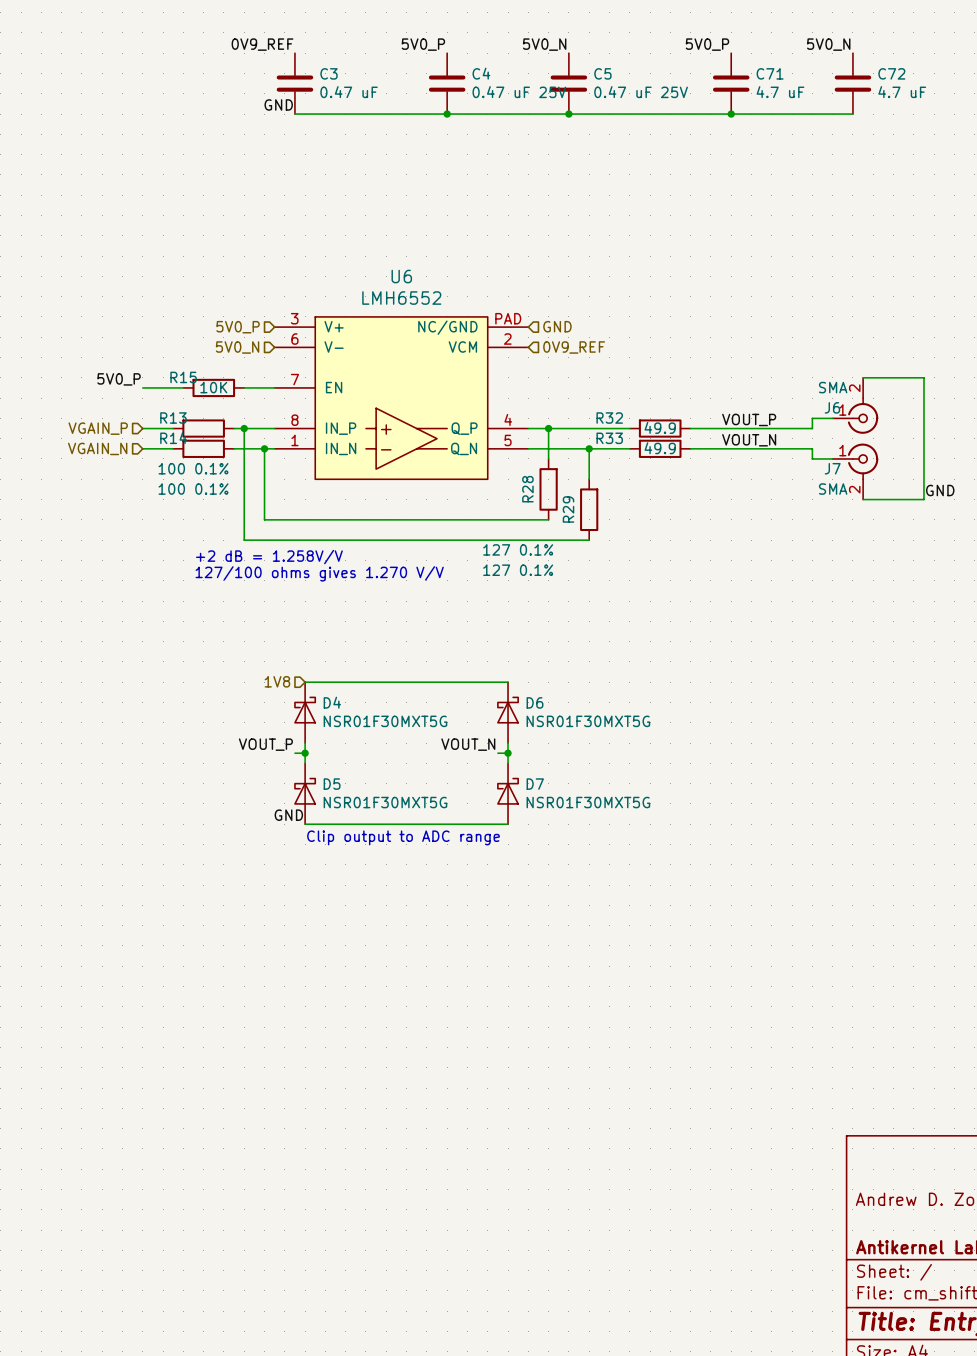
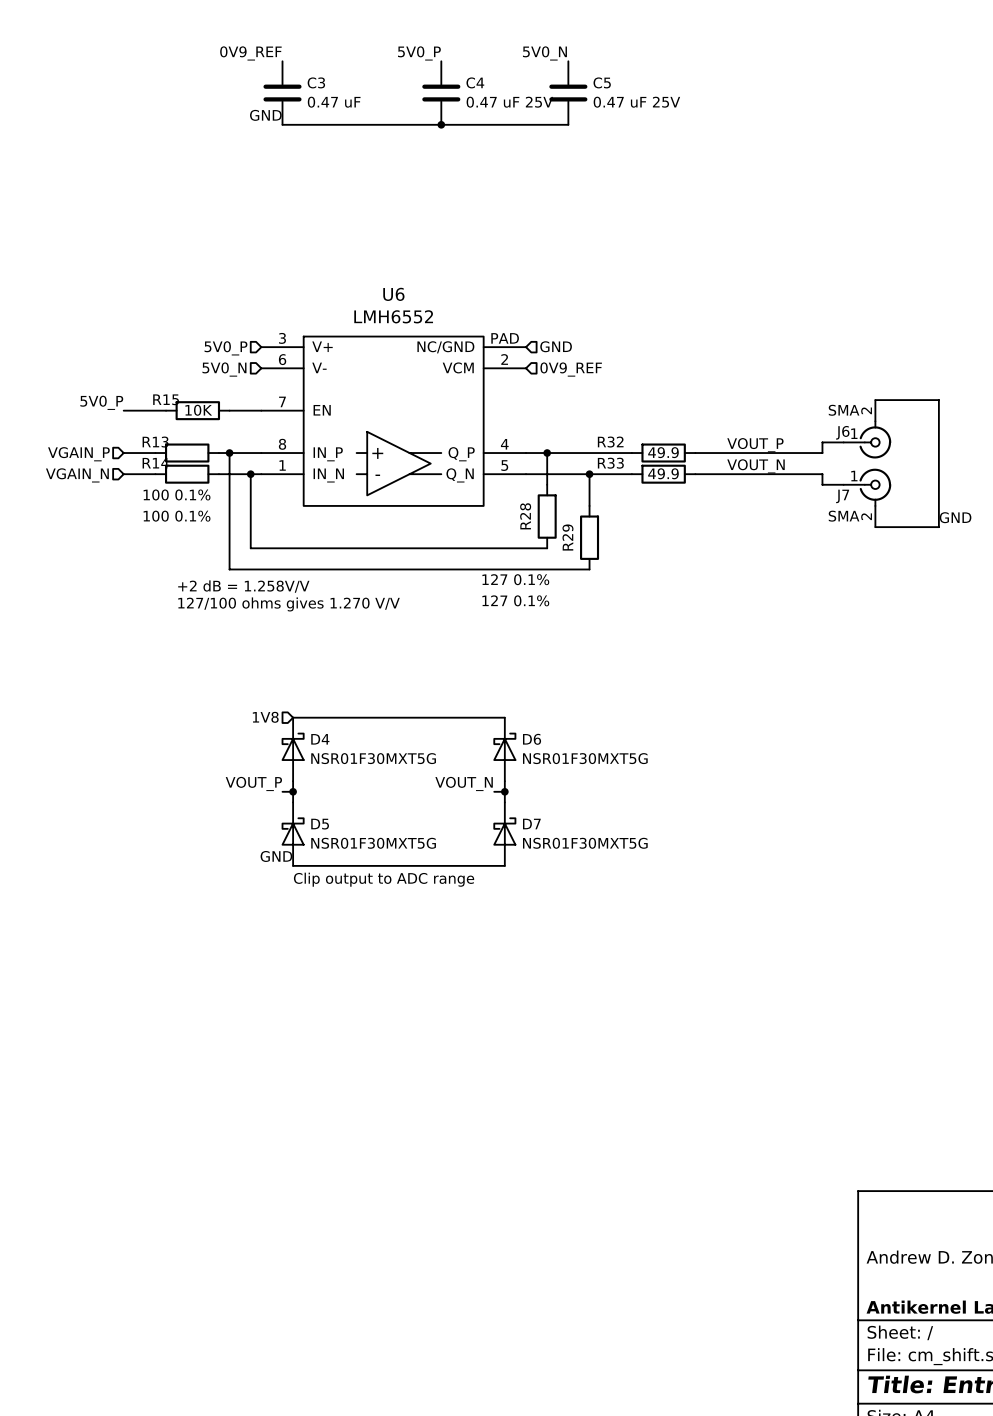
label: 5V0_P (707, 44) -> none
label: 5V0_N (828, 44) -> none
C71: 4.7 uF (731, 83) -> none
C72: 4.7 uF (852, 83) -> none
wire: (568, 114) (852, 114) -> none
junction: (568, 114) -> none
junction: (731, 114) -> none

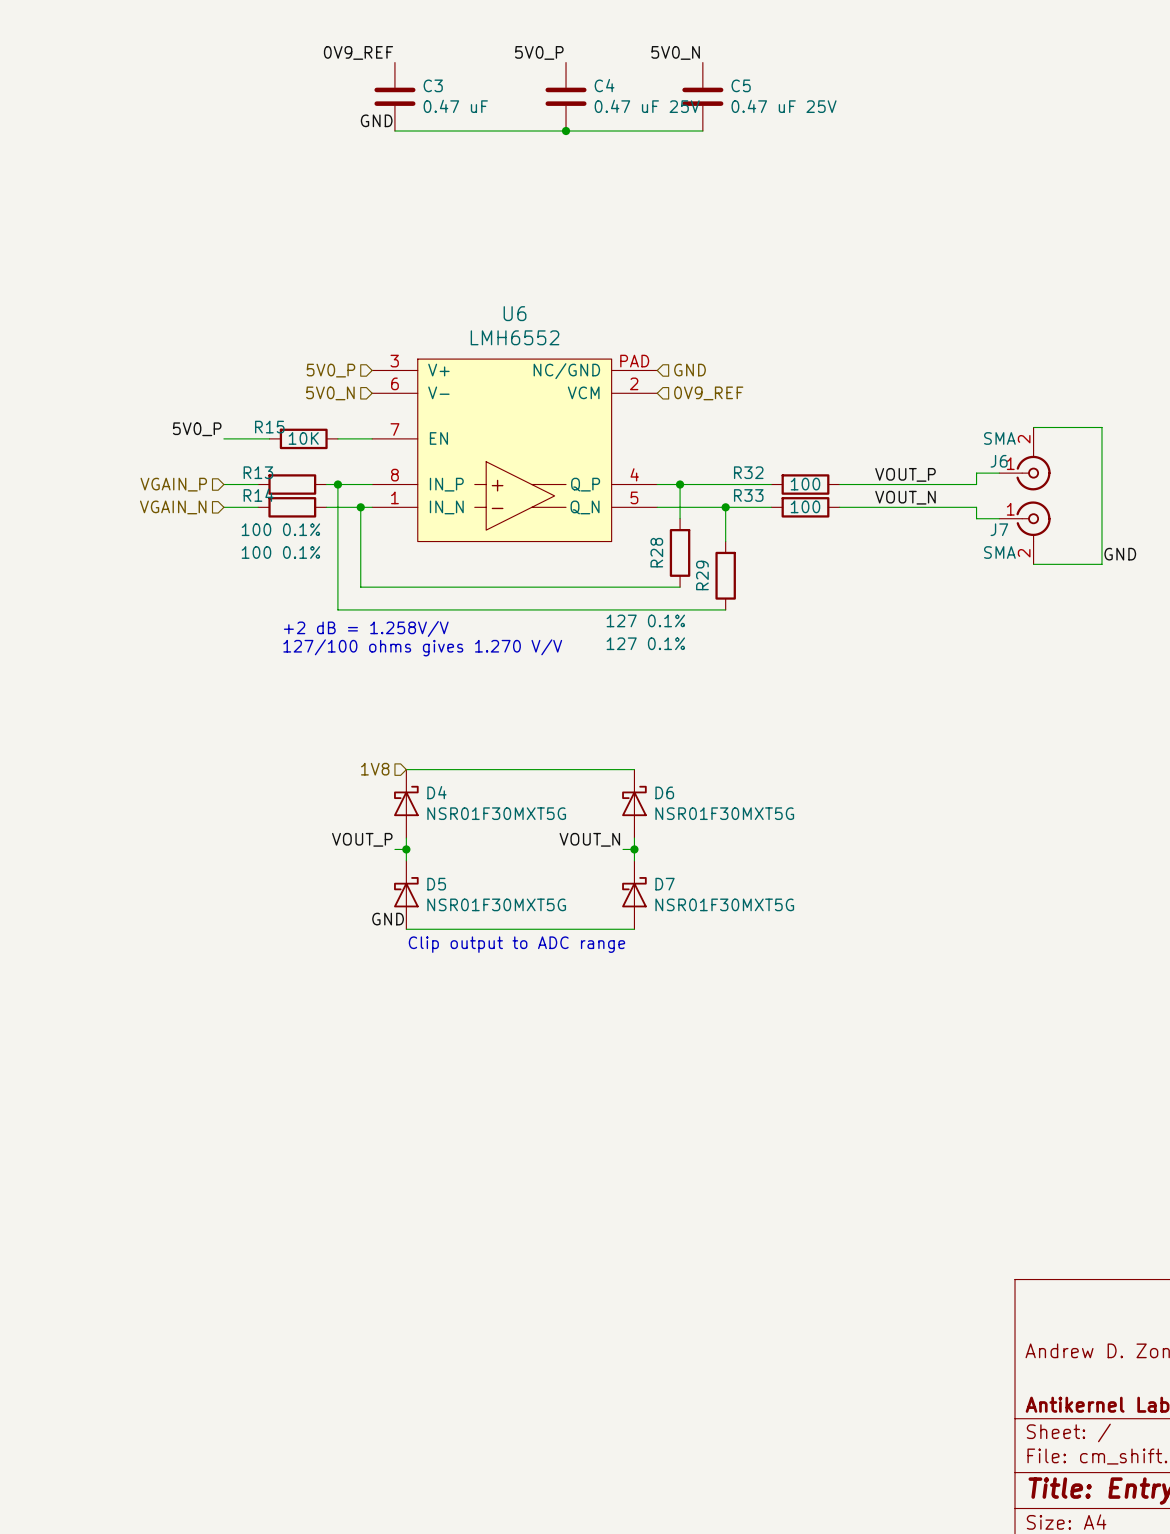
R32 value: 49.9 (663, 452) -> 100 (805, 484)
R33 value: 49.9 (663, 473) -> 100 (805, 506)

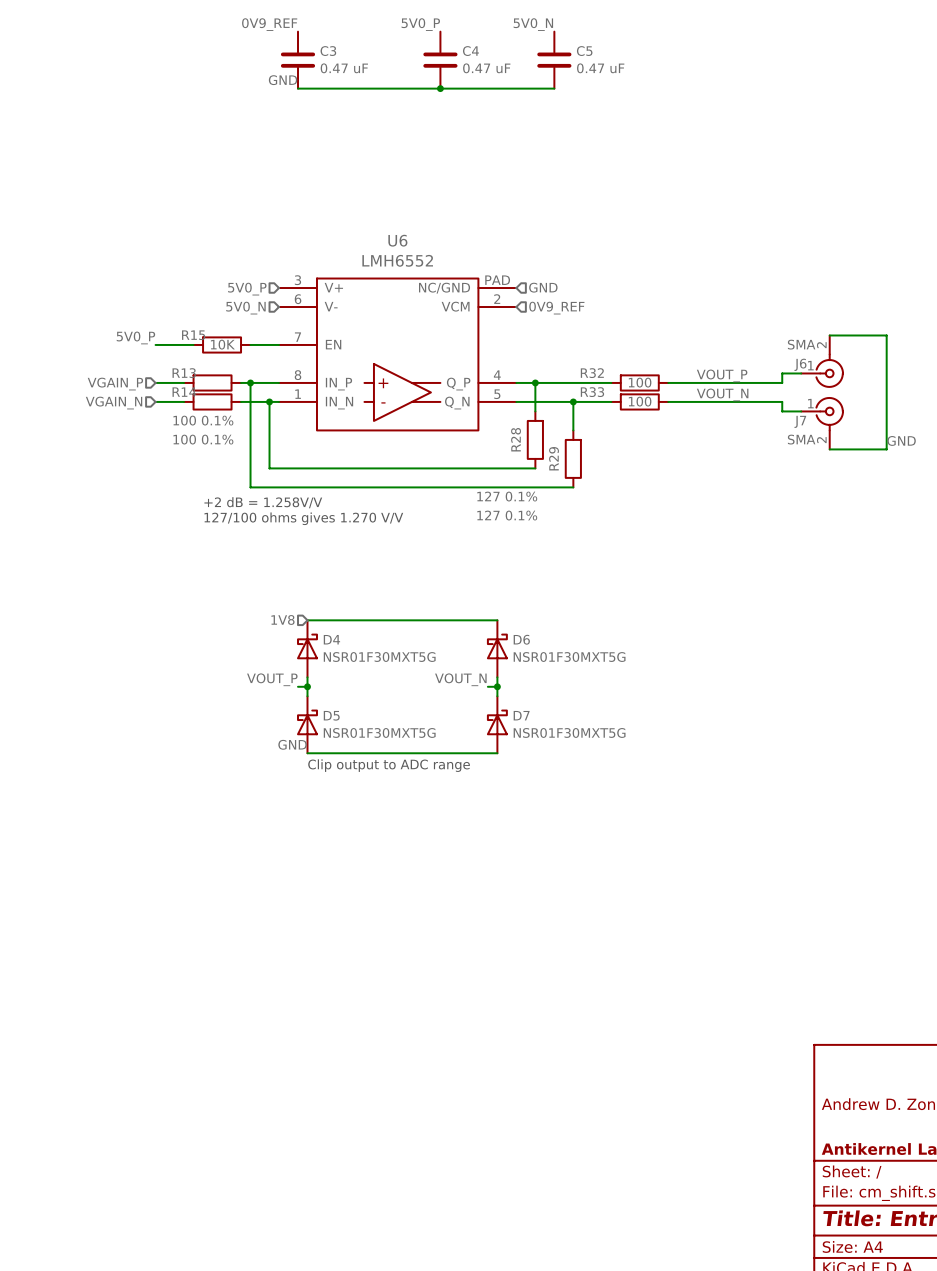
C4 value: 0.47 uF 25V (647, 106) -> 0.47 uF (486, 68)
C5 value: 0.47 uF 25V (784, 106) -> 0.47 uF (600, 68)

